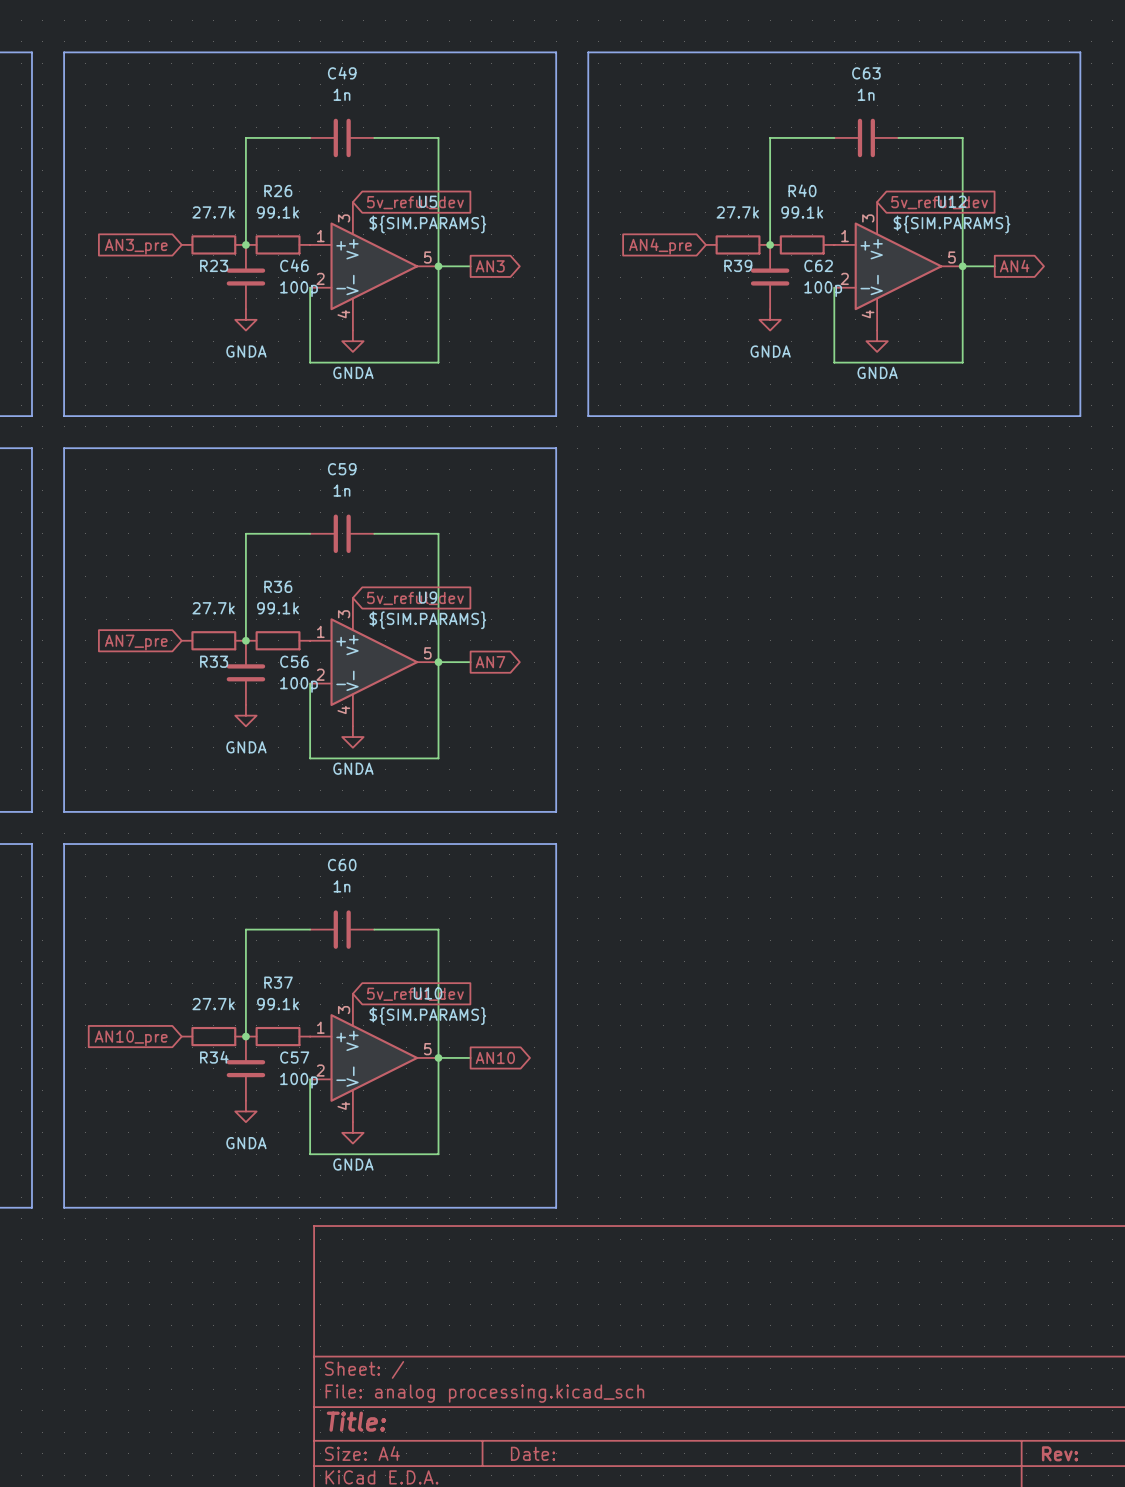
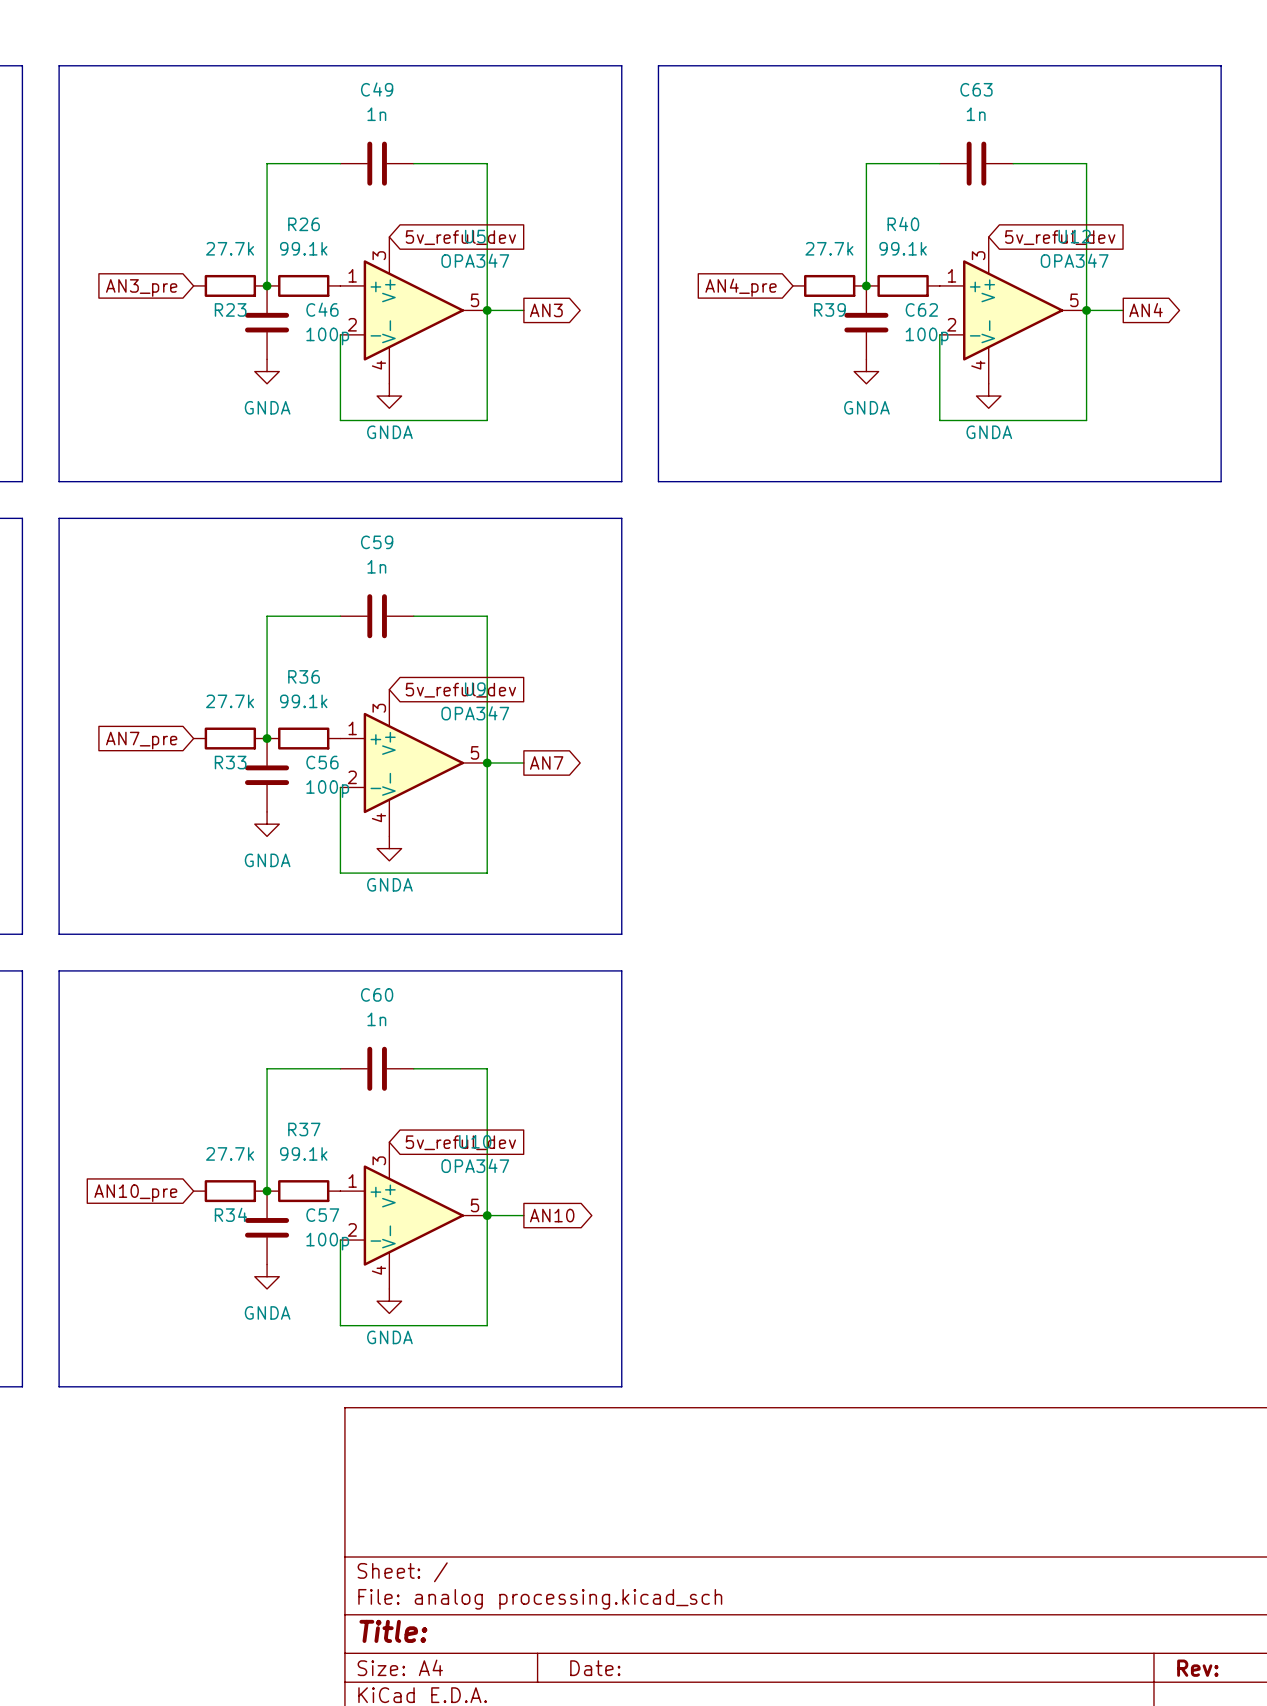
U5 value: ${SIM.PARAMS} (427, 224) -> OPA347 (475, 260)
U12 value: ${SIM.PARAMS} (951, 224) -> OPA347 (1074, 260)
U9 value: ${SIM.PARAMS} (427, 620) -> OPA347 (475, 713)
U10 value: ${SIM.PARAMS} (427, 1016) -> OPA347 (475, 1165)

